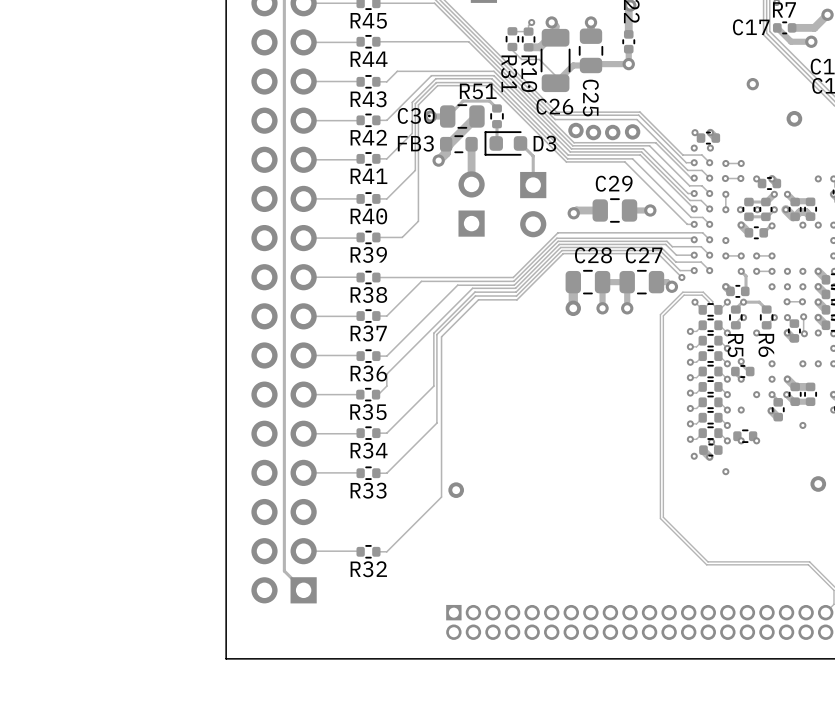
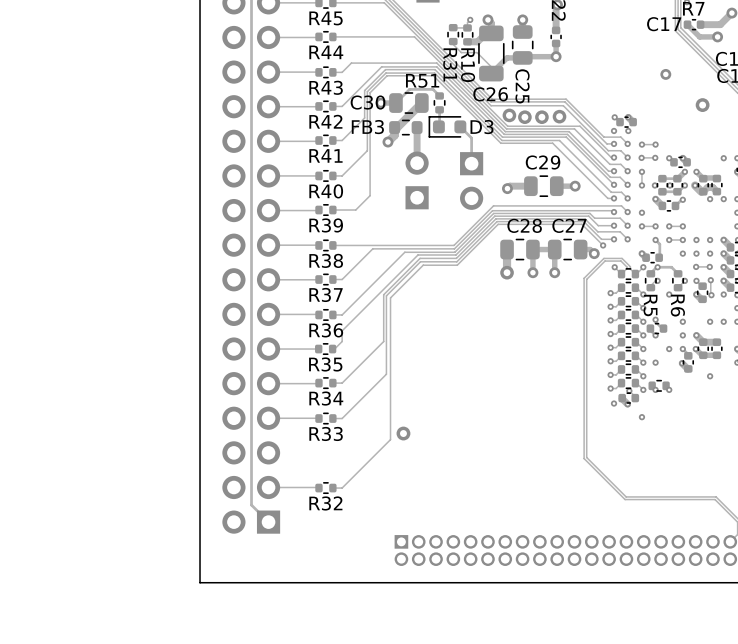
via: (818, 483) -> none

